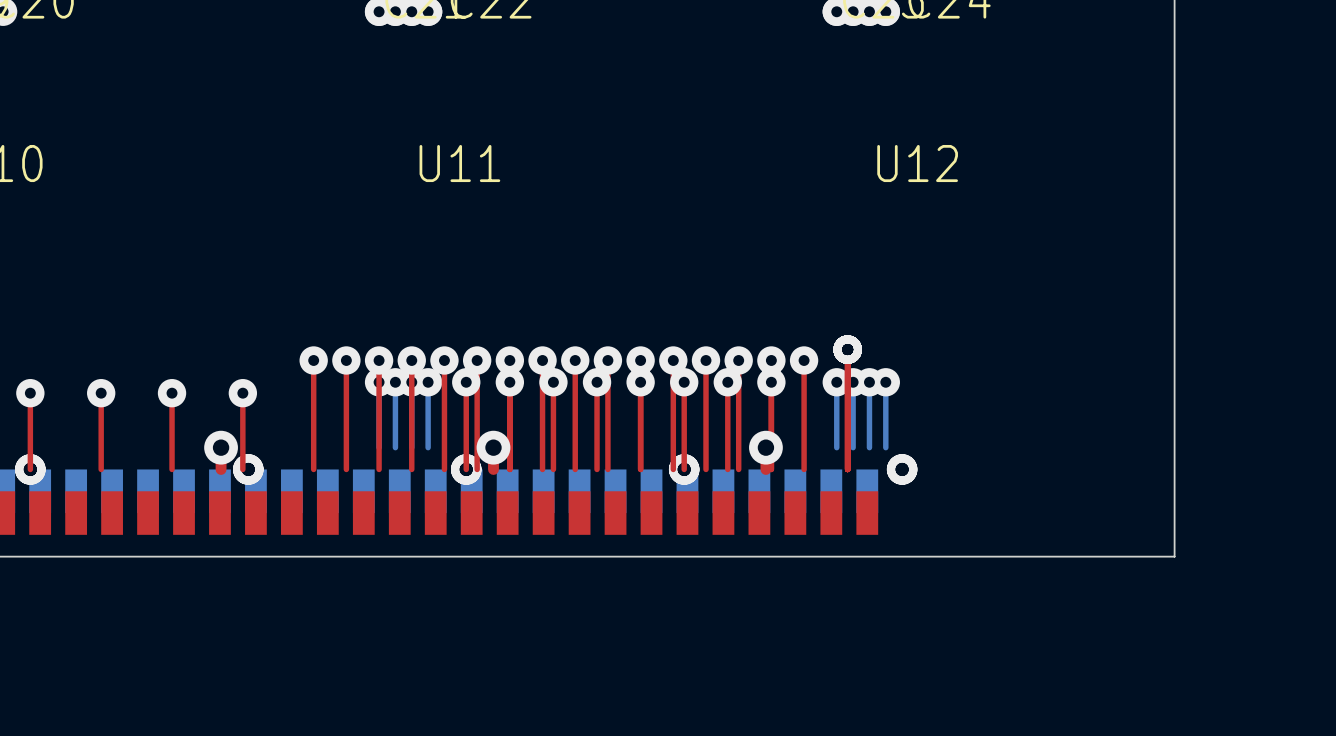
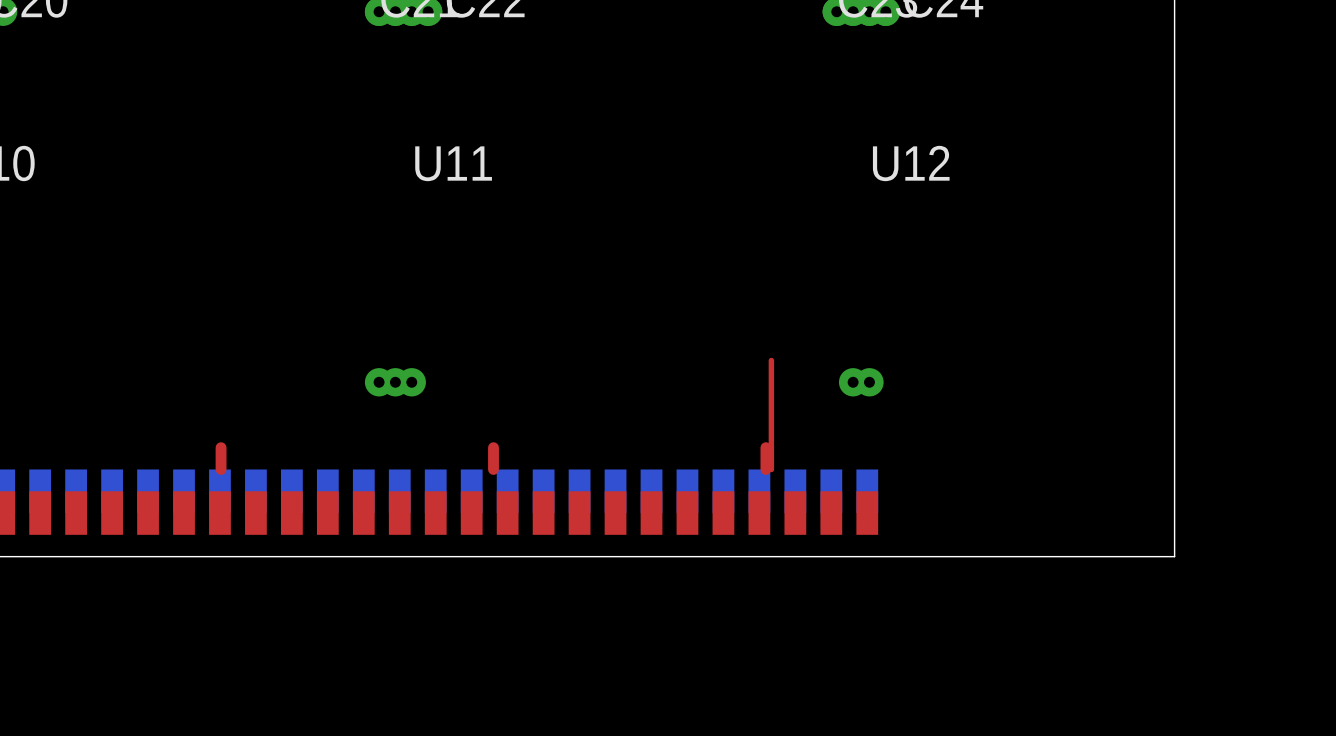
top track: (847, 349) (847, 469) -> none
via: (847, 349) -> none
top track: (313, 360) (313, 469) -> none
via: (313, 360) -> none
top track: (346, 360) (346, 469) -> none
via: (346, 360) -> none
top track: (379, 360) (379, 469) -> none
via: (379, 360) -> none
top track: (411, 360) (411, 469) -> none
via: (411, 360) -> none
top track: (444, 360) (444, 469) -> none
via: (444, 360) -> none
top track: (477, 360) (477, 469) -> none
via: (477, 360) -> none
top track: (509, 360) (509, 469) -> none
via: (509, 360) -> none
top track: (542, 360) (542, 469) -> none
via: (542, 360) -> none
top track: (575, 360) (575, 469) -> none
via: (575, 360) -> none
top track: (607, 360) (607, 469) -> none
via: (607, 360) -> none
top track: (640, 360) (640, 469) -> none
via: (640, 360) -> none
top track: (673, 360) (673, 469) -> none
via: (673, 360) -> none
top track: (706, 360) (706, 469) -> none
via: (706, 360) -> none
top track: (738, 360) (738, 469) -> none
via: (738, 360) -> none
via: (771, 360) -> none
top track: (804, 360) (804, 469) -> none
via: (804, 360) -> none
bottom track: (395, 382) (395, 447) -> none
bottom track: (428, 382) (428, 447) -> none
via: (428, 382) -> none
top track: (466, 382) (466, 469) -> none
via: (466, 382) -> none
via: (509, 382) -> none
top track: (553, 382) (553, 469) -> none
via: (553, 382) -> none
top track: (597, 382) (597, 469) -> none
via: (597, 382) -> none
via: (640, 382) -> none
top track: (684, 382) (684, 469) -> none
via: (684, 382) -> none
top track: (727, 382) (727, 469) -> none
via: (727, 382) -> none
via: (771, 382) -> none
bottom track: (836, 382) (836, 447) -> none
via: (836, 382) -> none
bottom track: (853, 382) (853, 447) -> none
bottom track: (869, 382) (869, 447) -> none
bottom track: (885, 382) (885, 447) -> none
via: (885, 382) -> none
top track: (30, 393) (30, 469) -> none
via: (30, 393) -> none
top track: (101, 393) (101, 469) -> none
via: (101, 393) -> none
top track: (172, 393) (172, 469) -> none
via: (172, 393) -> none
top track: (242, 393) (242, 469) -> none
via: (242, 393) -> none
via: (221, 447) -> none
via: (493, 447) -> none
via: (765, 447) -> none
via: (30, 469) -> none
via: (248, 469) -> none
via: (466, 469) -> none
via: (684, 469) -> none
via: (902, 469) -> none

